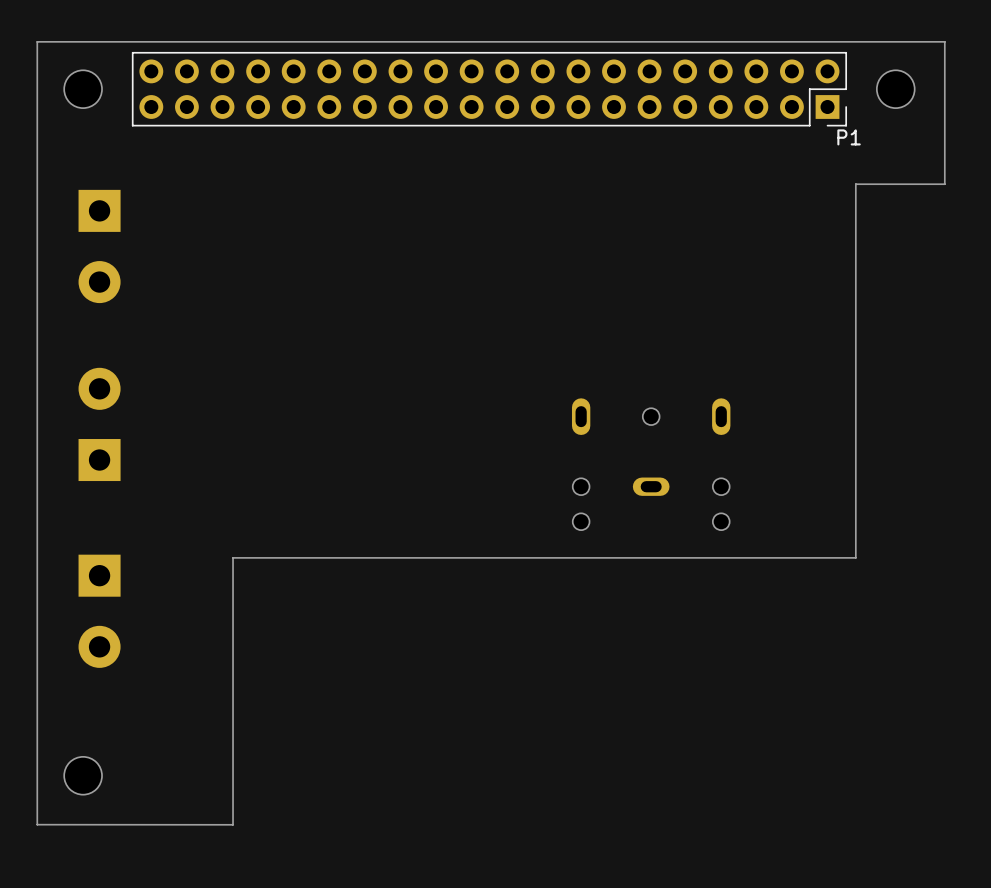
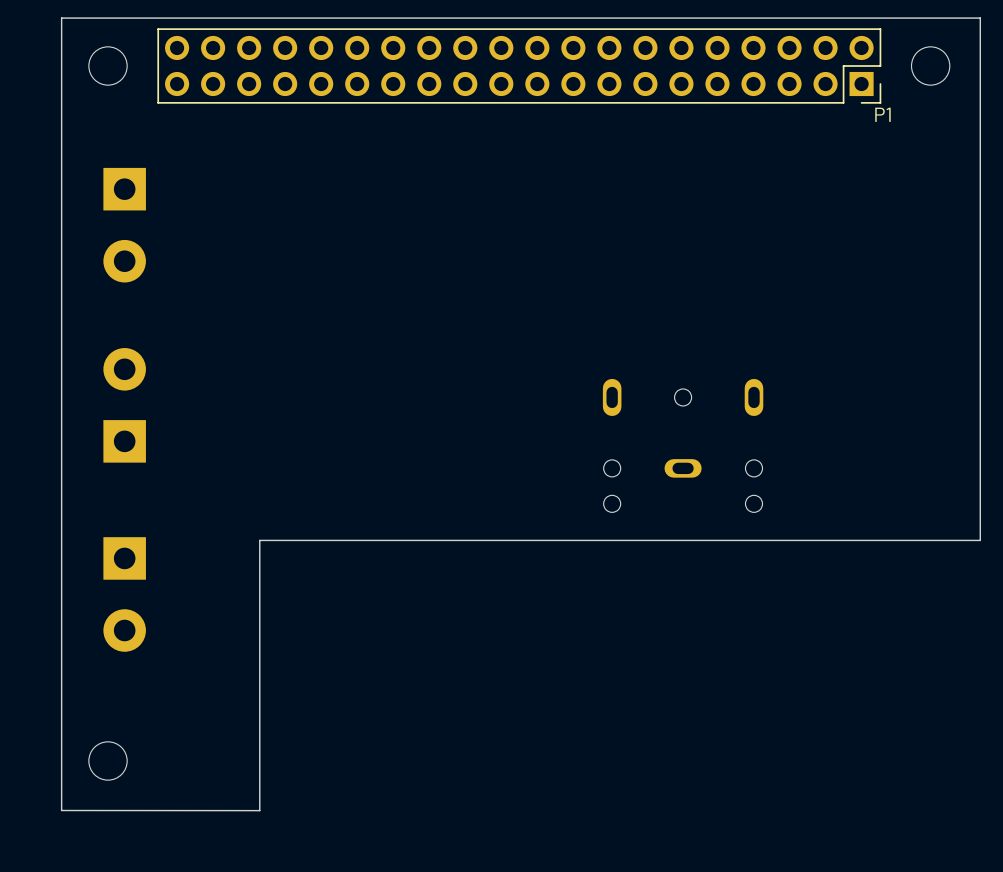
board edge: (944, 184) (855, 184) (855, 557) -> (980, 162) (980, 540) (890, 540)

